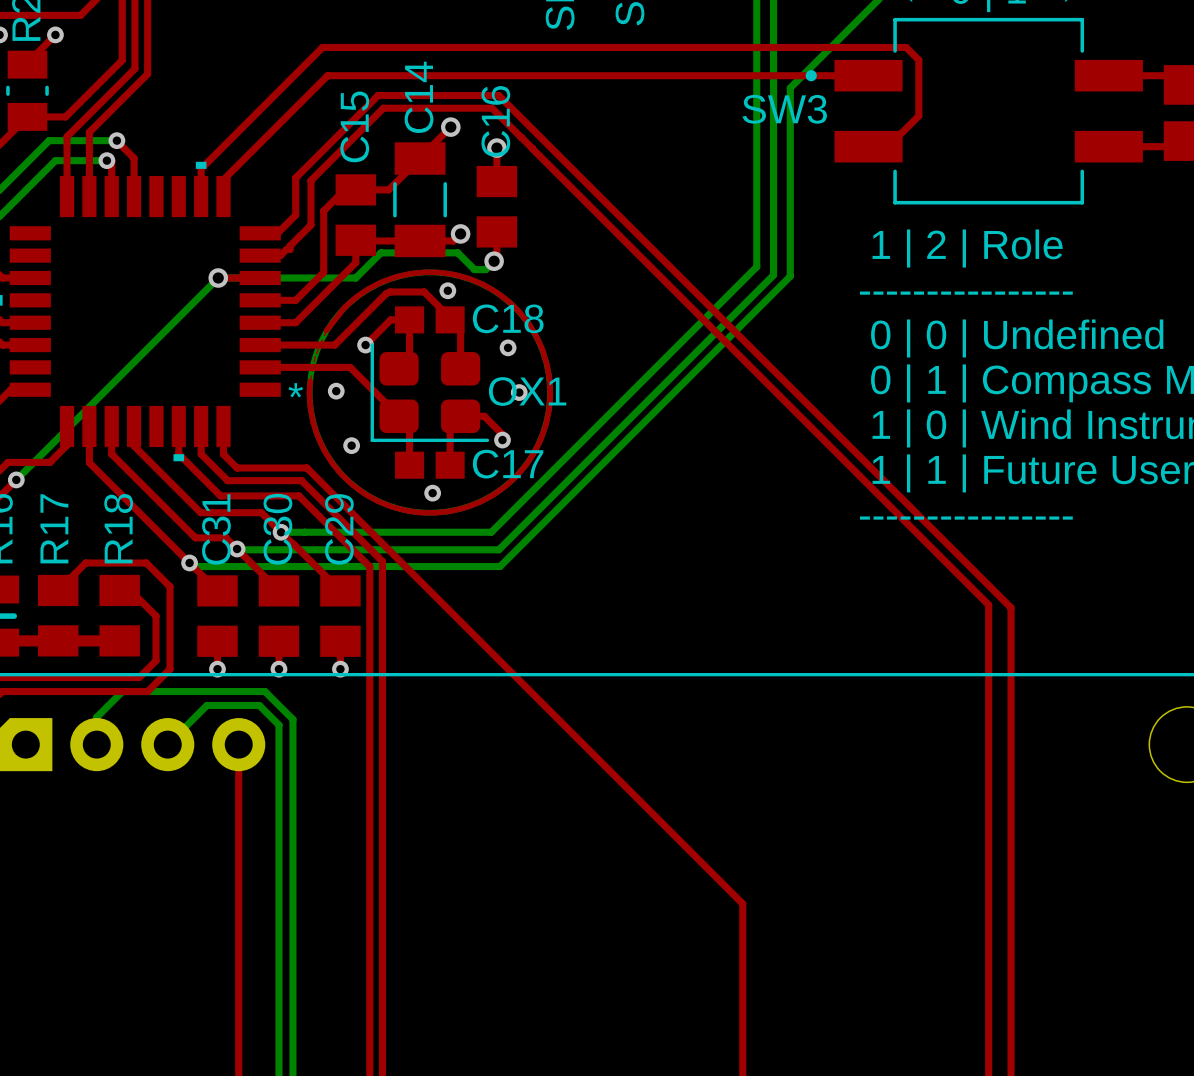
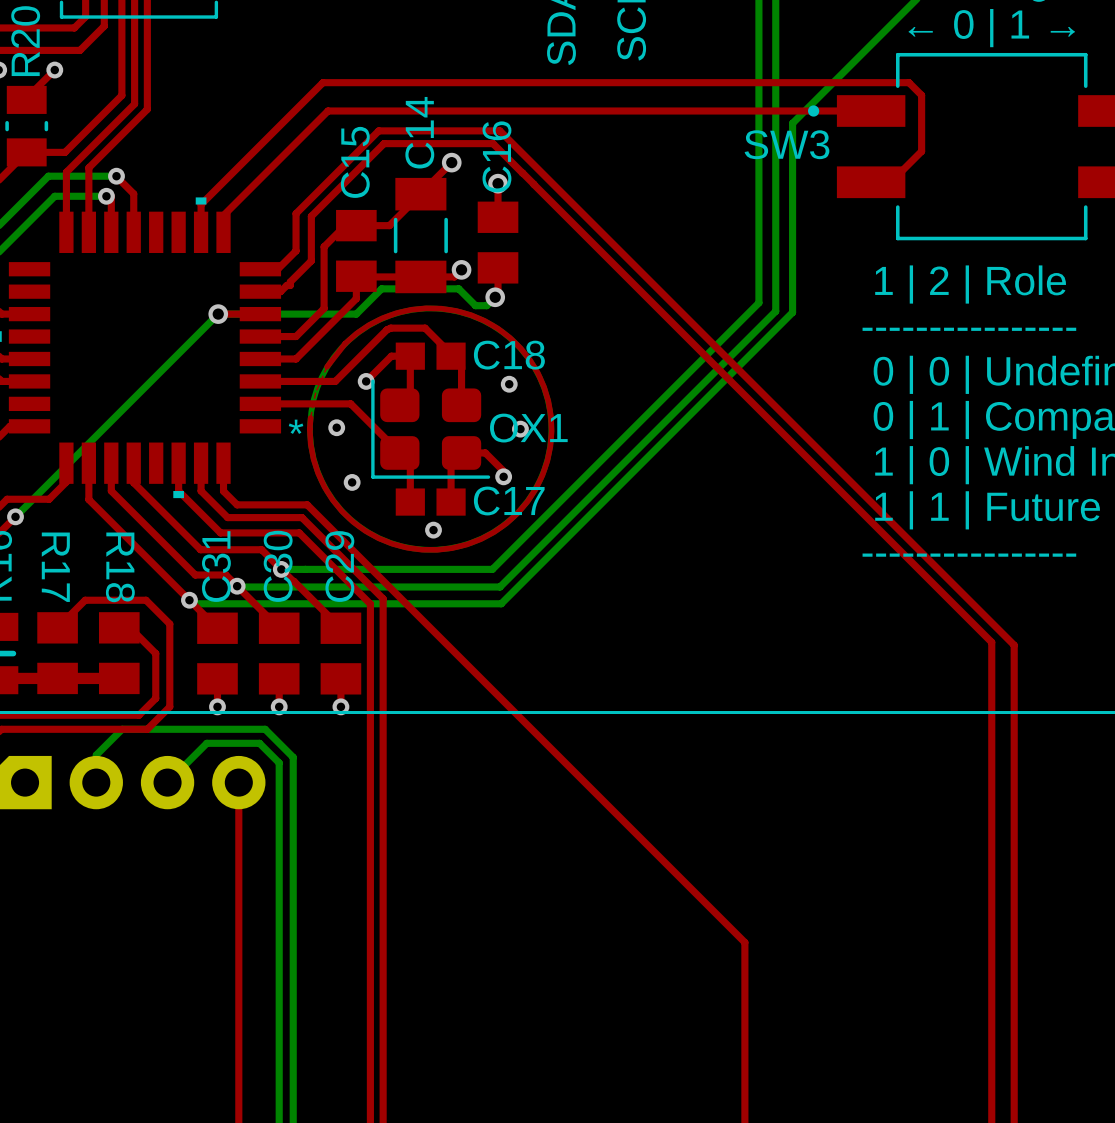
via: (447, 290) -> none
R17 name rotation: 0° (54, 528) -> 180° (55, 567)
R18 name rotation: 0° (118, 528) -> 180° (120, 567)

